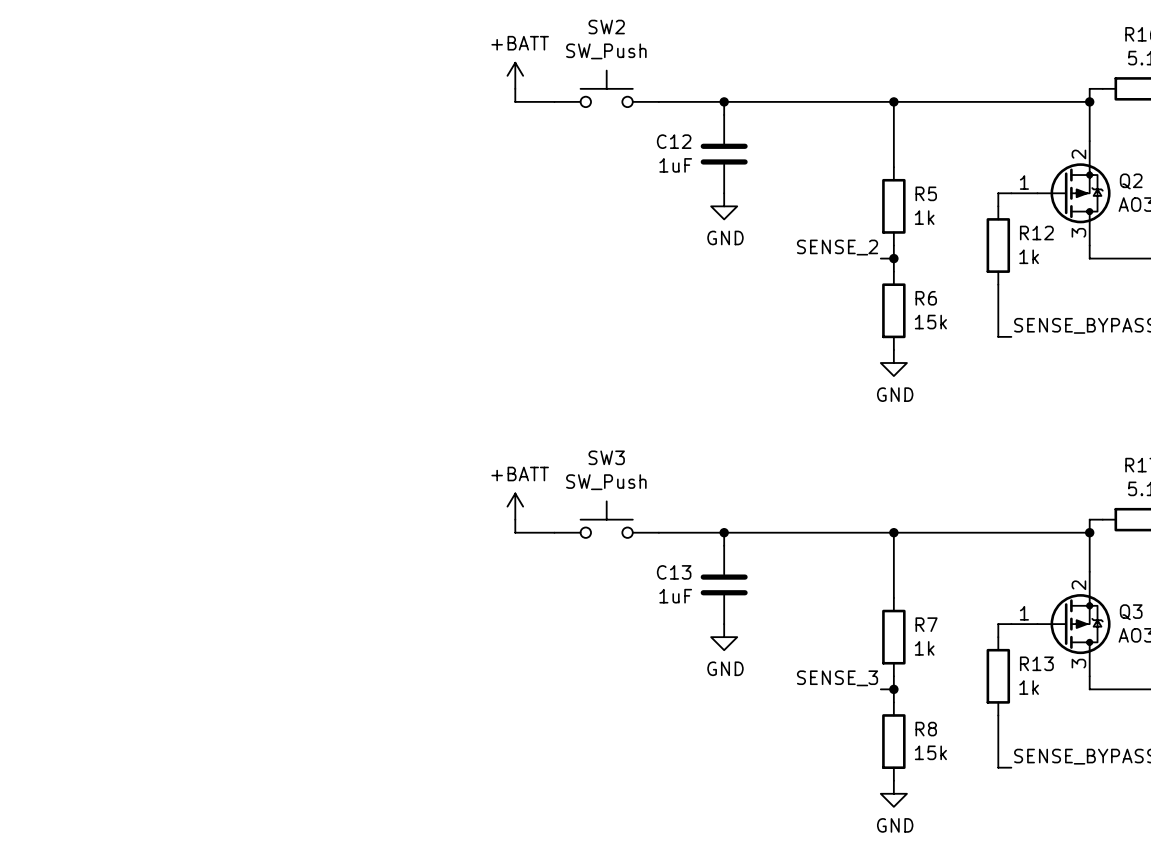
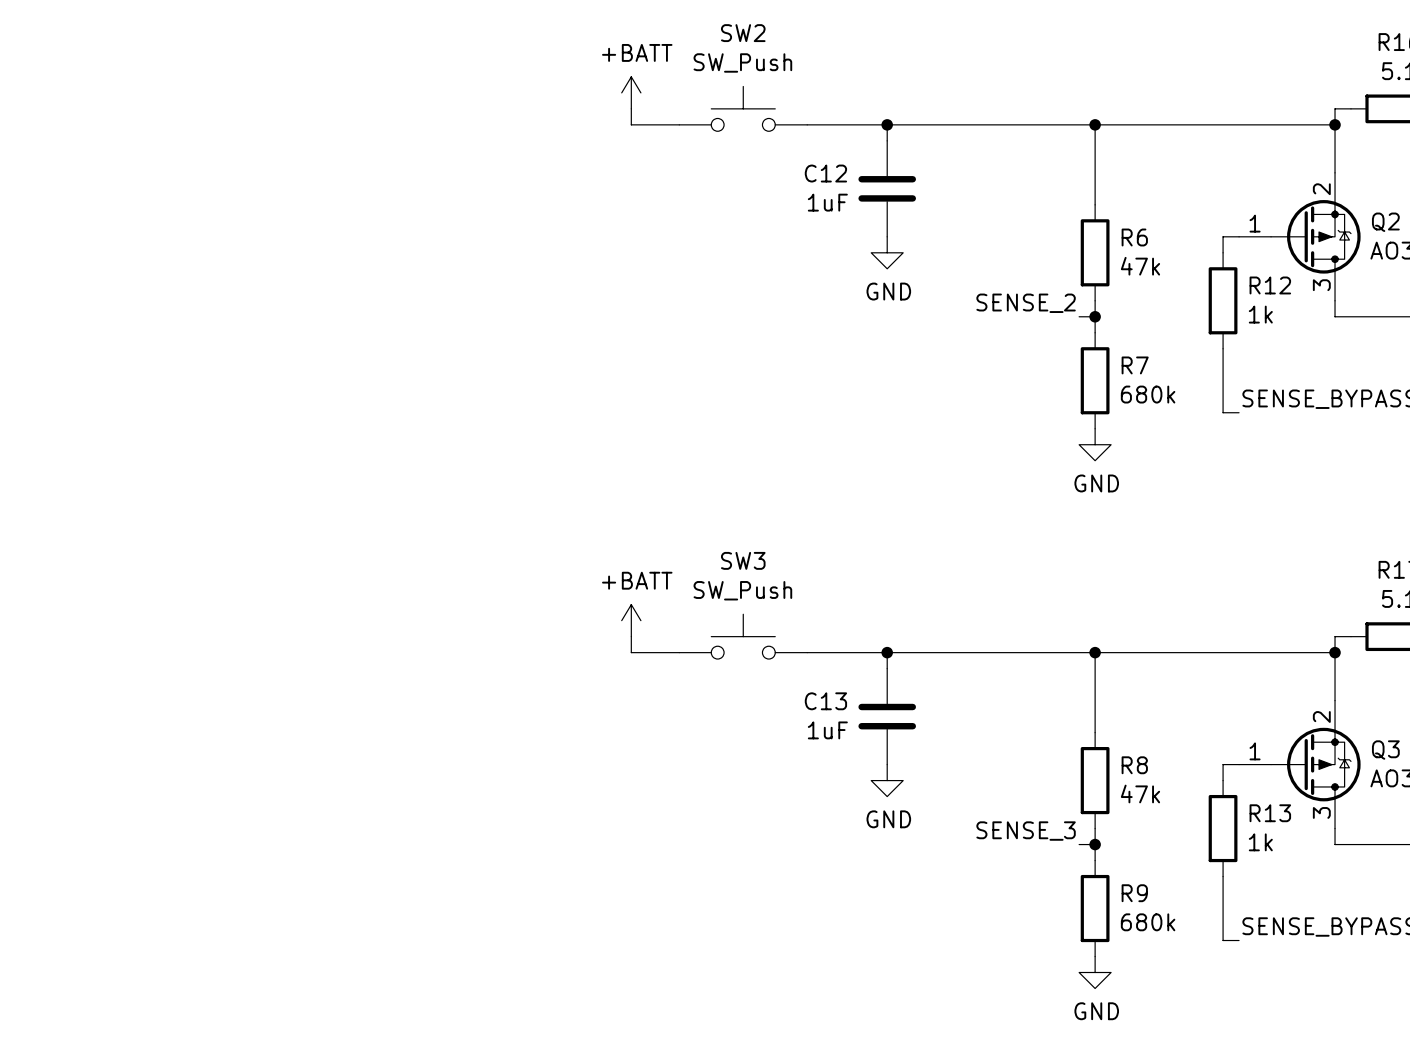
R5 name: R5 (926, 193) -> R6 (1134, 237)
R5 value: 1k (924, 217) -> 47k (1140, 266)
R6 name: R6 (926, 298) -> R7 (1135, 365)
R6 value: 15k (930, 322) -> 680k (1148, 394)
R7 name: R7 (926, 624) -> R8 (1134, 765)
R7 value: 1k (924, 648) -> 47k (1140, 794)
R8 name: R8 (926, 729) -> R9 (1134, 893)
R8 value: 15k (930, 752) -> 680k (1148, 922)

